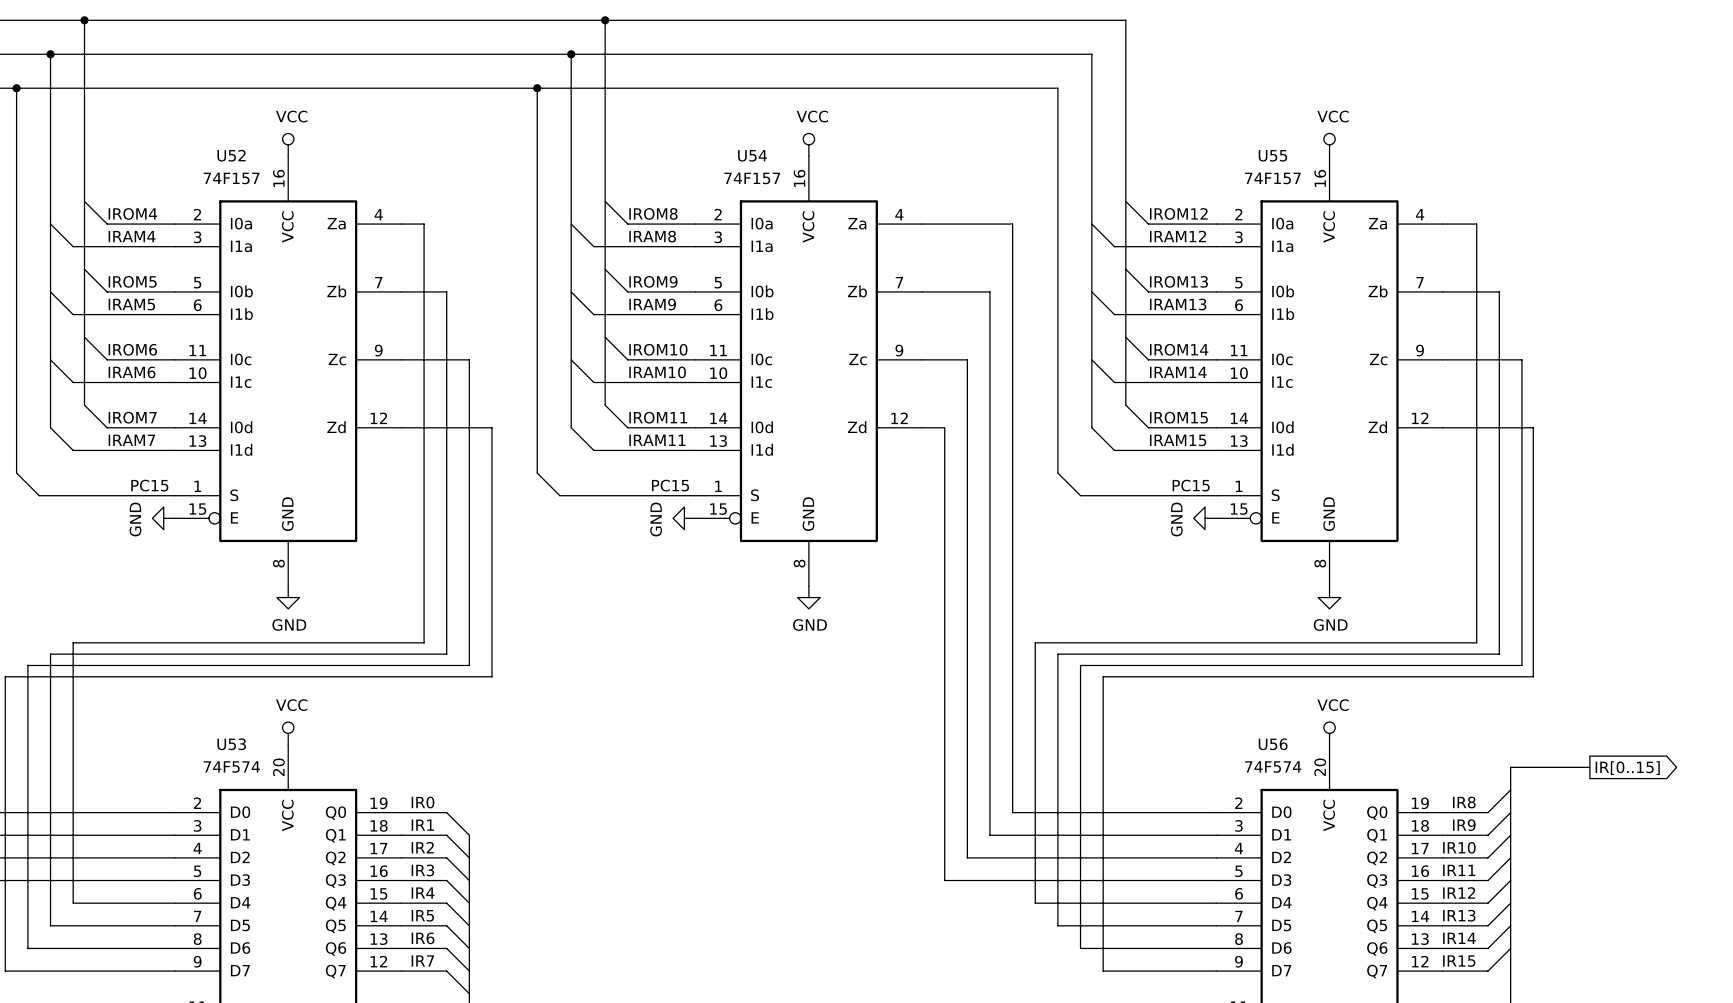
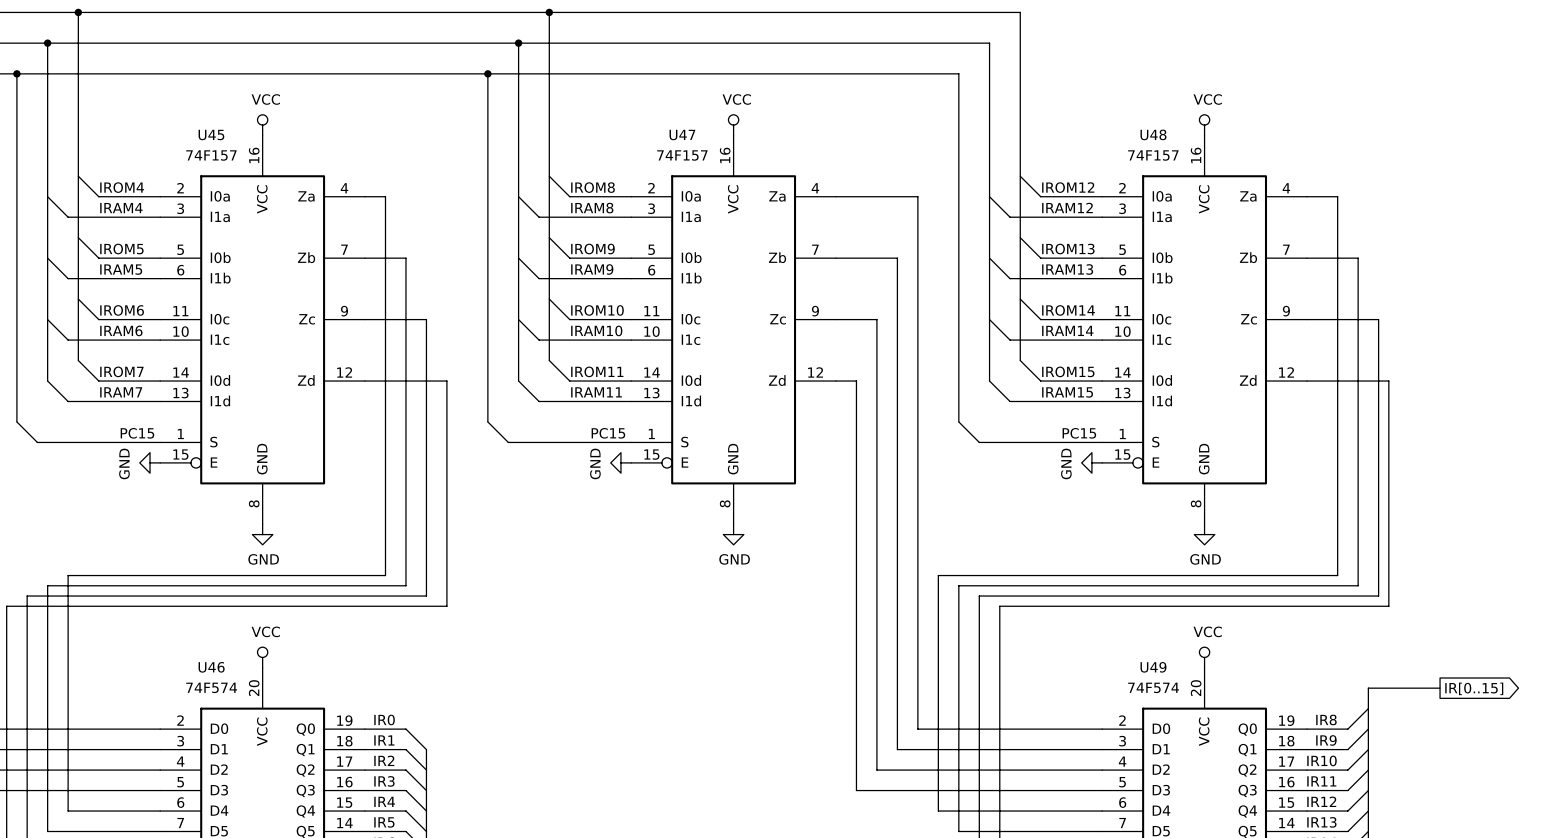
U52 name: U52 (231, 155) -> U45 (211, 135)
U54 name: U54 (752, 155) -> U47 (682, 135)
U55 name: U55 (1272, 155) -> U48 (1153, 134)
U53 name: U53 (231, 744) -> U46 (211, 667)
U56 name: U56 (1273, 744) -> U49 (1153, 667)

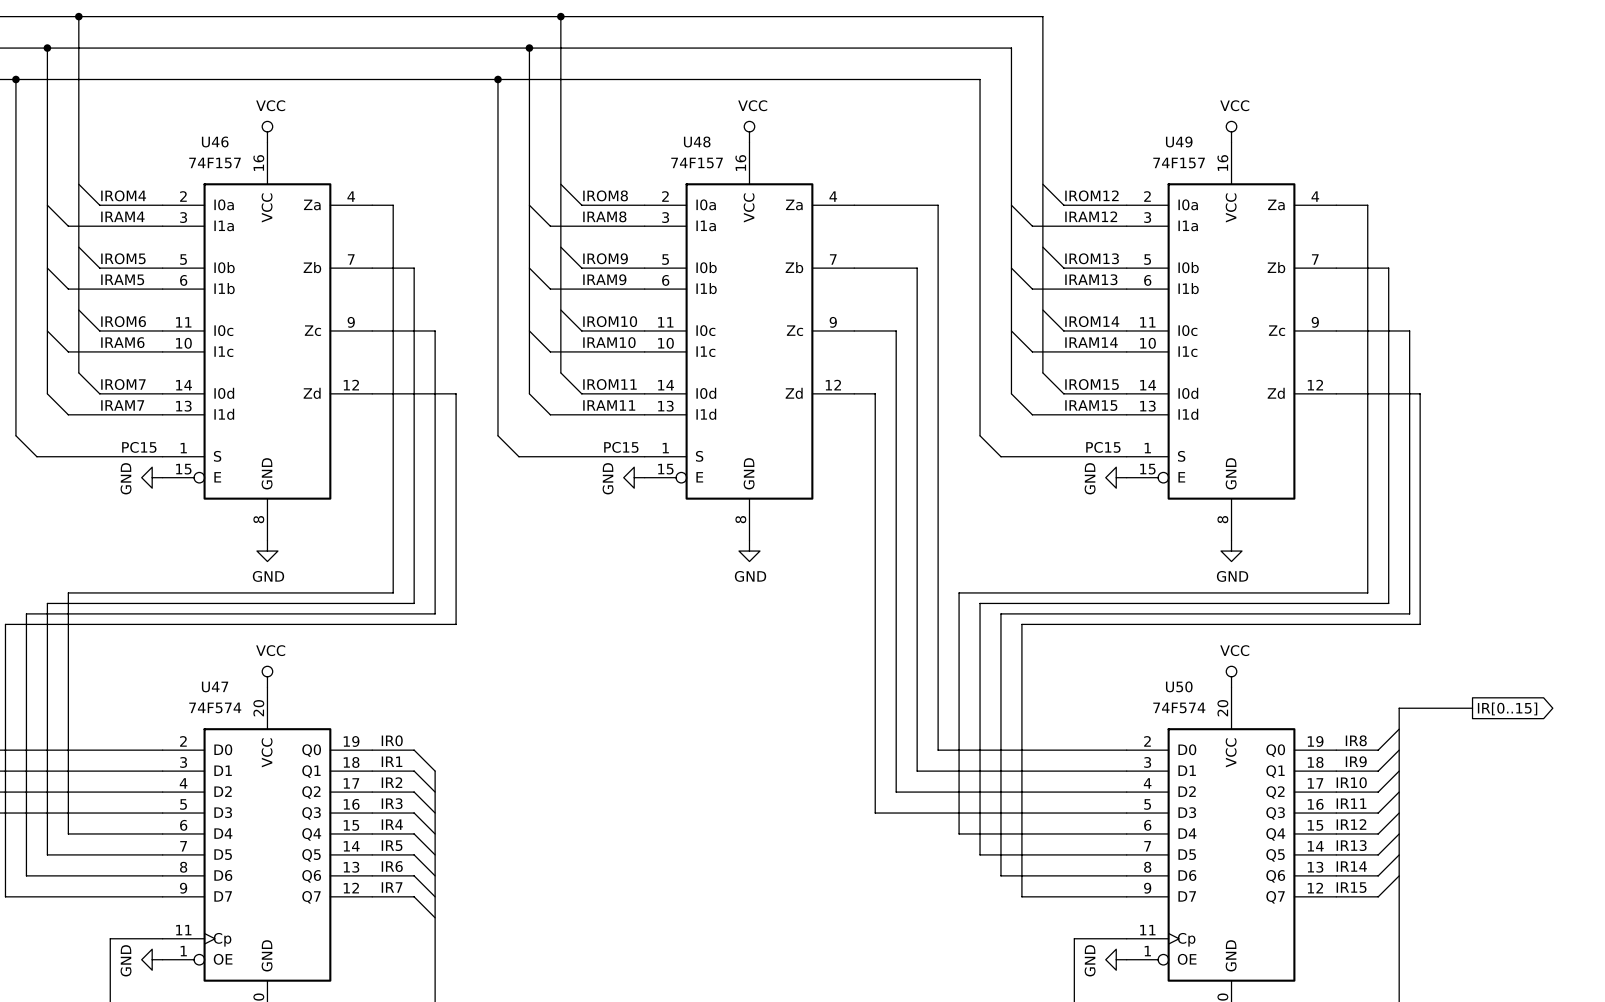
U48 name: U48 (1153, 134) -> U49 (1179, 141)
U45 name: U45 (211, 135) -> U46 (215, 141)
U47 name: U47 (682, 135) -> U48 (697, 141)
U46 name: U46 (211, 667) -> U47 (215, 686)
U49 name: U49 (1153, 667) -> U50 (1179, 686)

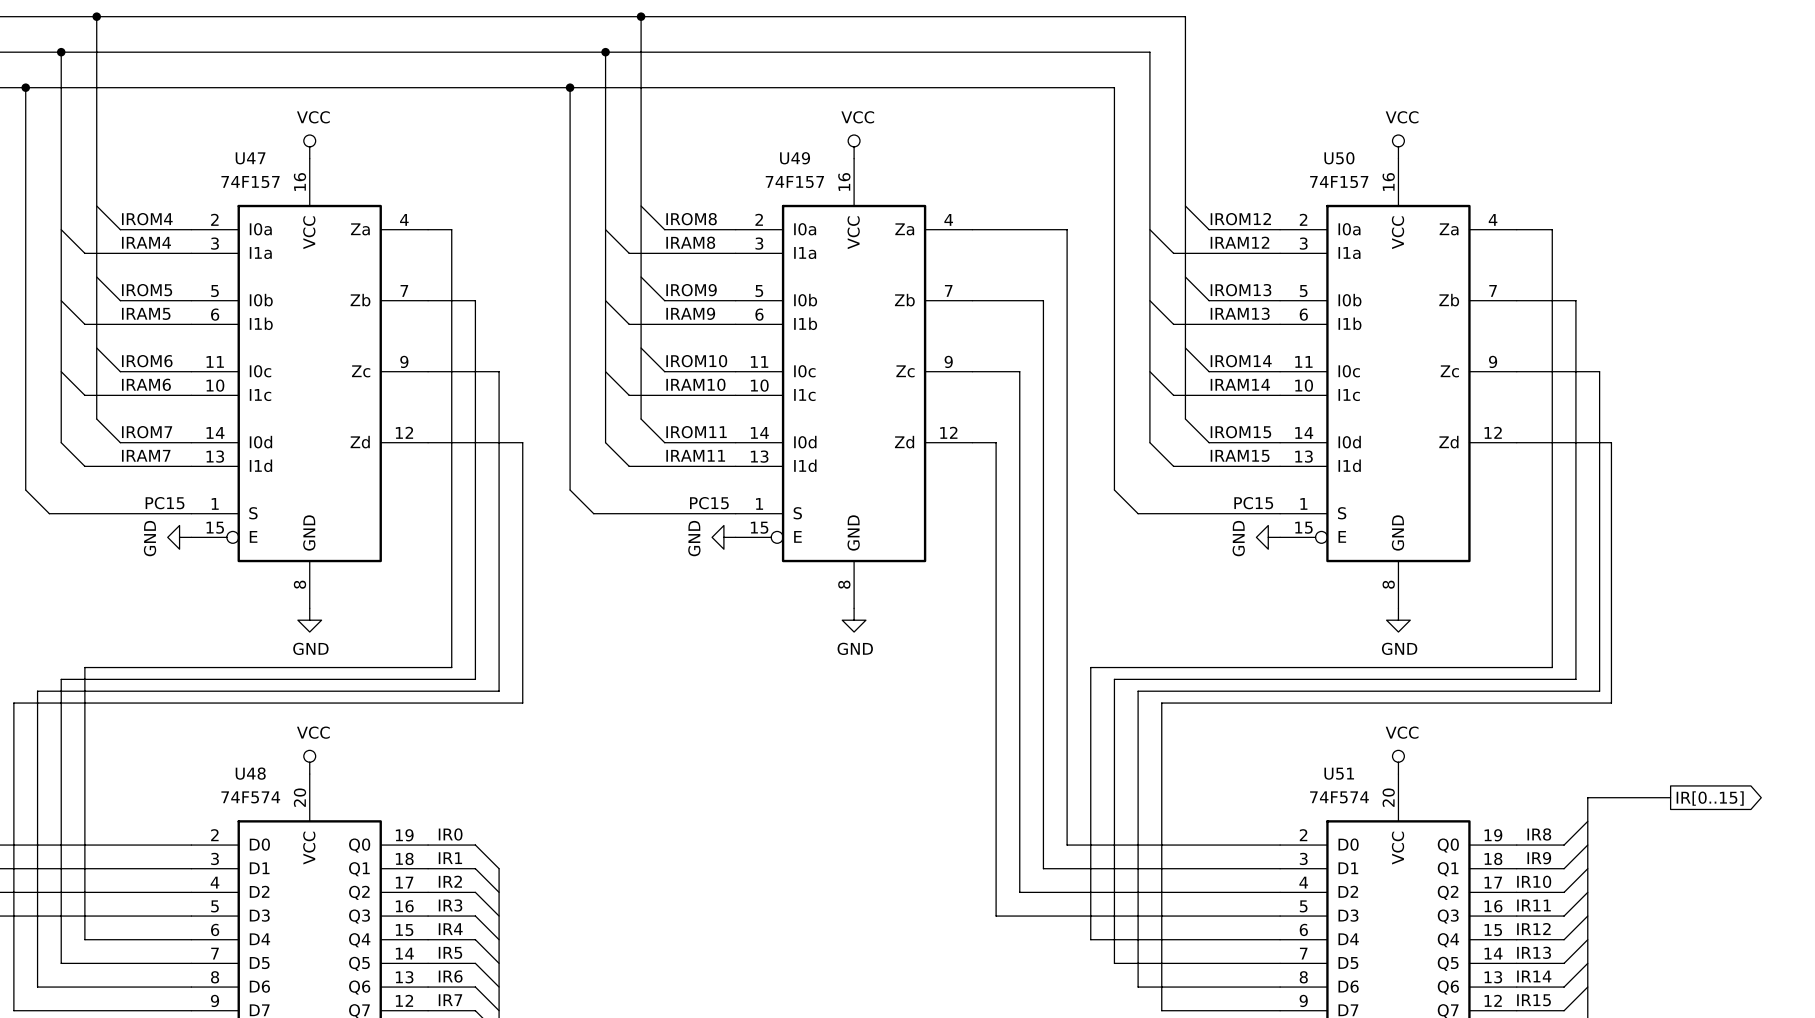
U46 name: U46 (215, 141) -> U47 (250, 158)
U48 name: U48 (697, 141) -> U49 (795, 158)
U49 name: U49 (1179, 141) -> U50 (1339, 158)
U47 name: U47 (215, 686) -> U48 (250, 773)
U50 name: U50 (1179, 686) -> U51 (1339, 773)

